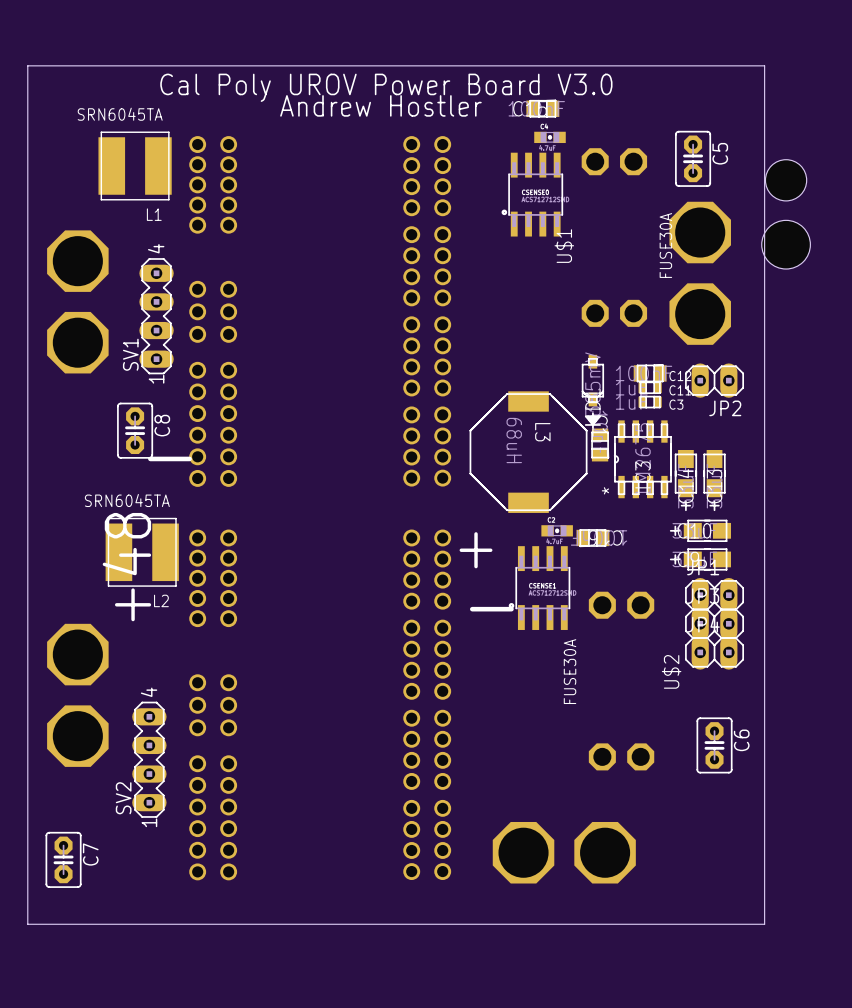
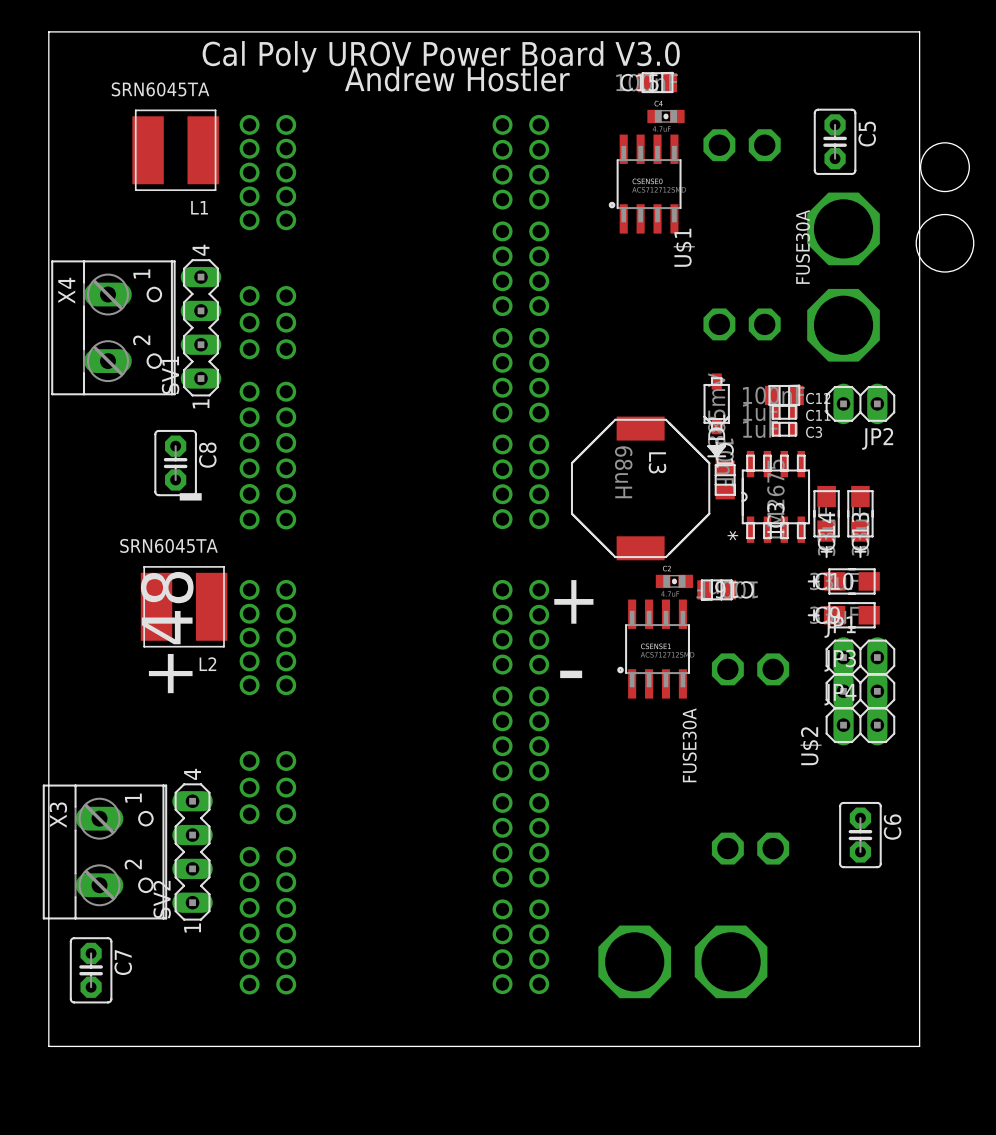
part: (77, 301) -> none
X4: none -> (113, 327)
part: (77, 695) -> none
X3: none -> (104, 851)

